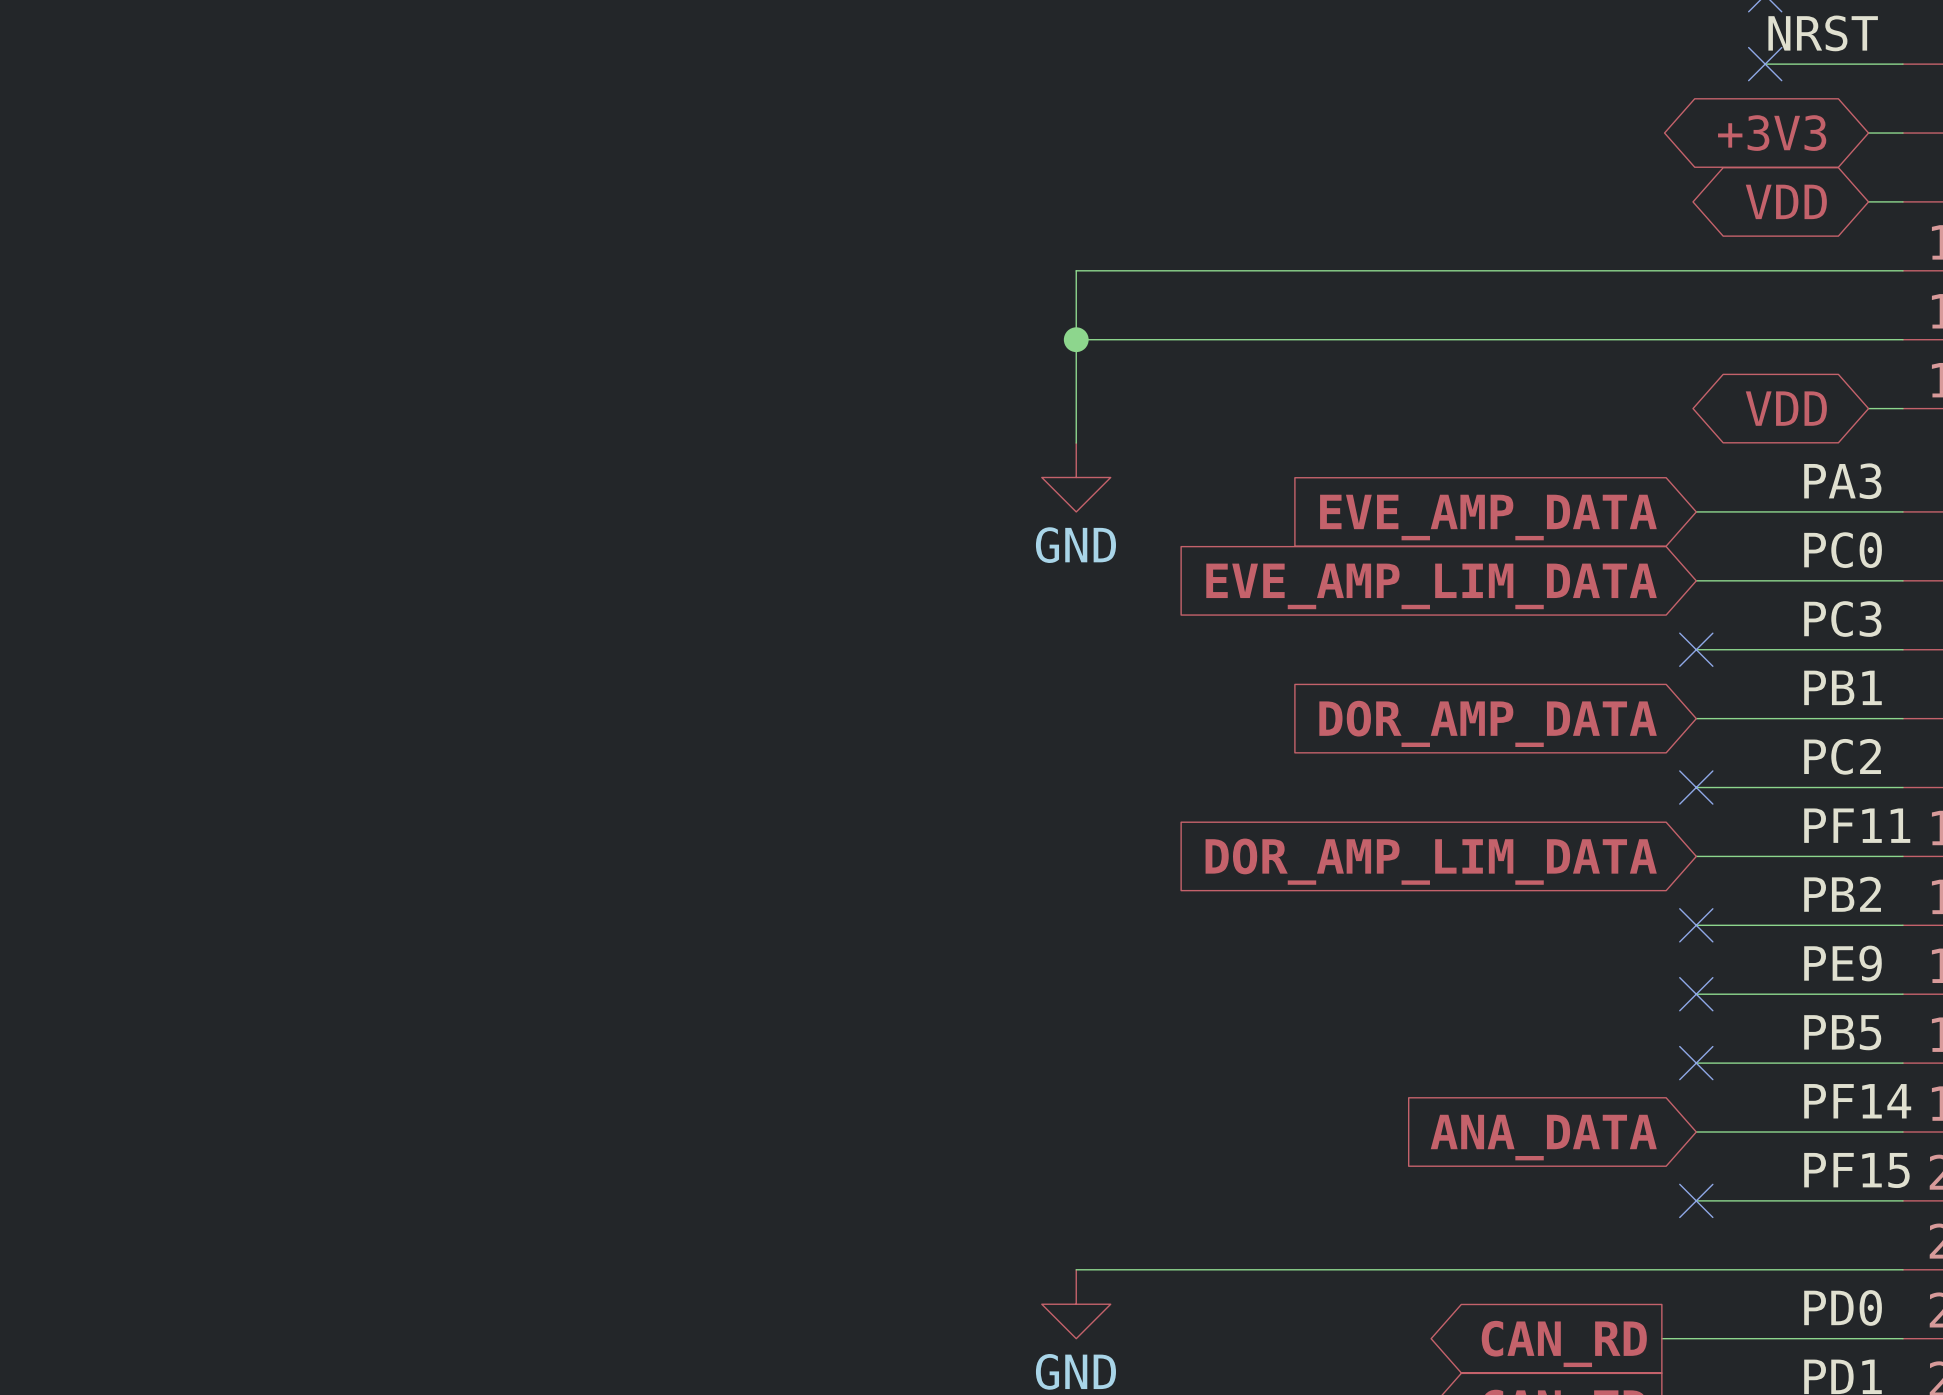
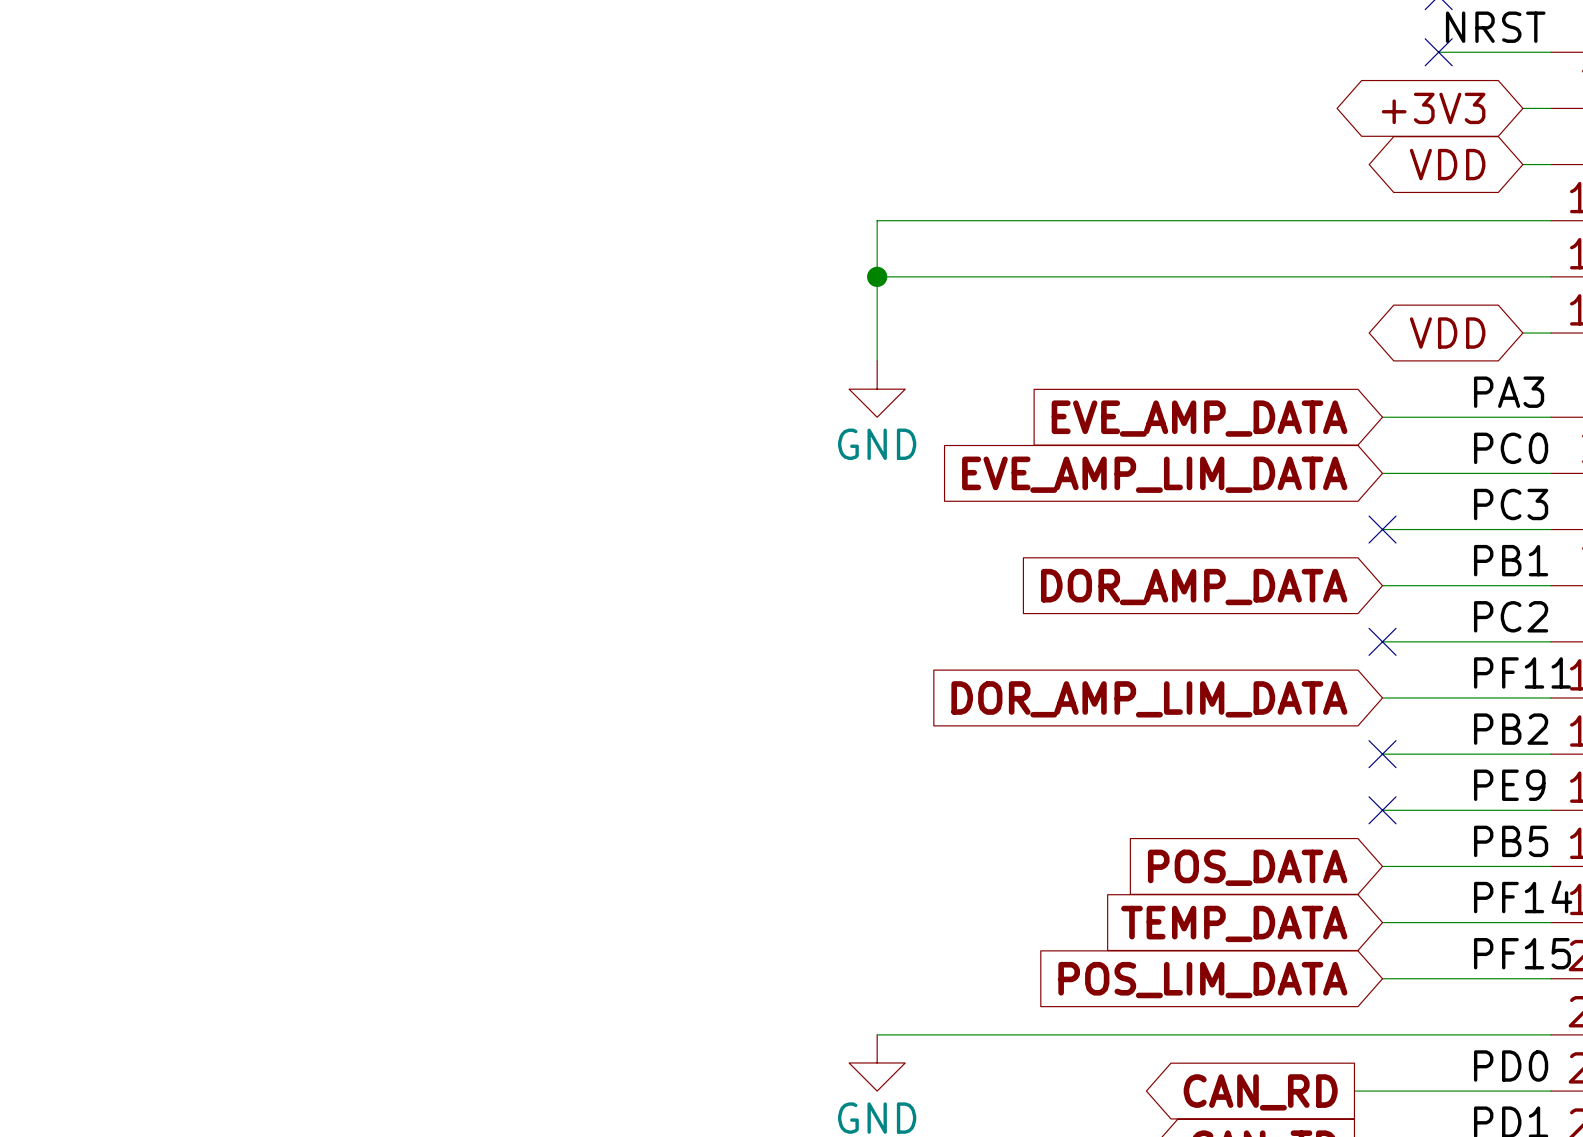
no-connect mark: (1696, 1063) -> none
global label: none -> POS_DATA (1247, 867)
global label: ANA_DATA (1543, 1137) -> TEMP_DATA (1234, 923)
no-connect mark: (1696, 1200) -> none
global label: none -> POS_LIM_DATA (1202, 980)

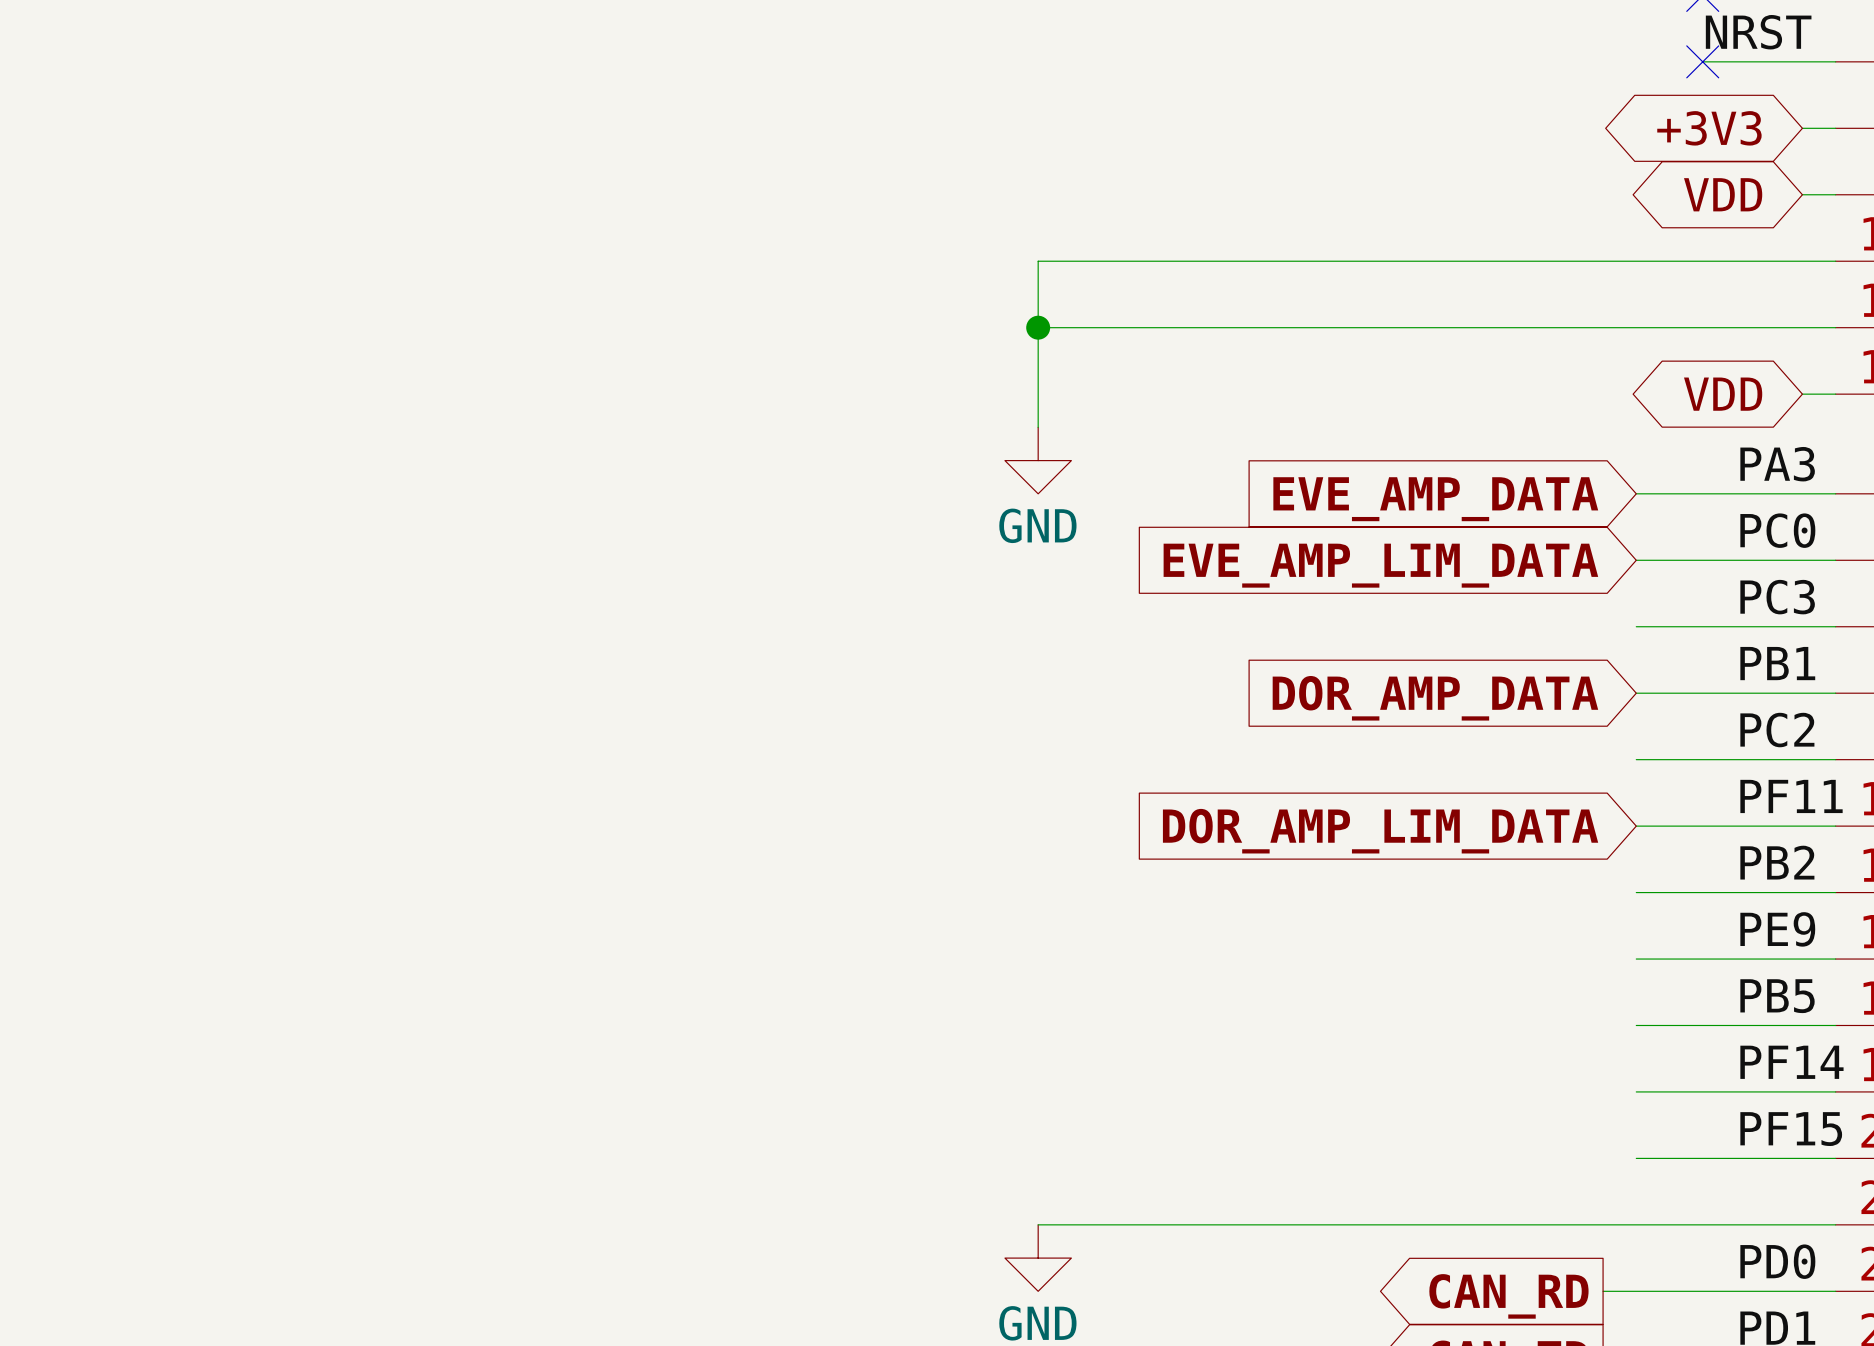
no-connect mark: (1382, 529) -> none
no-connect mark: (1382, 641) -> none
no-connect mark: (1382, 754) -> none
no-connect mark: (1382, 810) -> none
global label: POS_DATA (1247, 867) -> none
global label: TEMP_DATA (1234, 923) -> none
global label: POS_LIM_DATA (1202, 980) -> none

